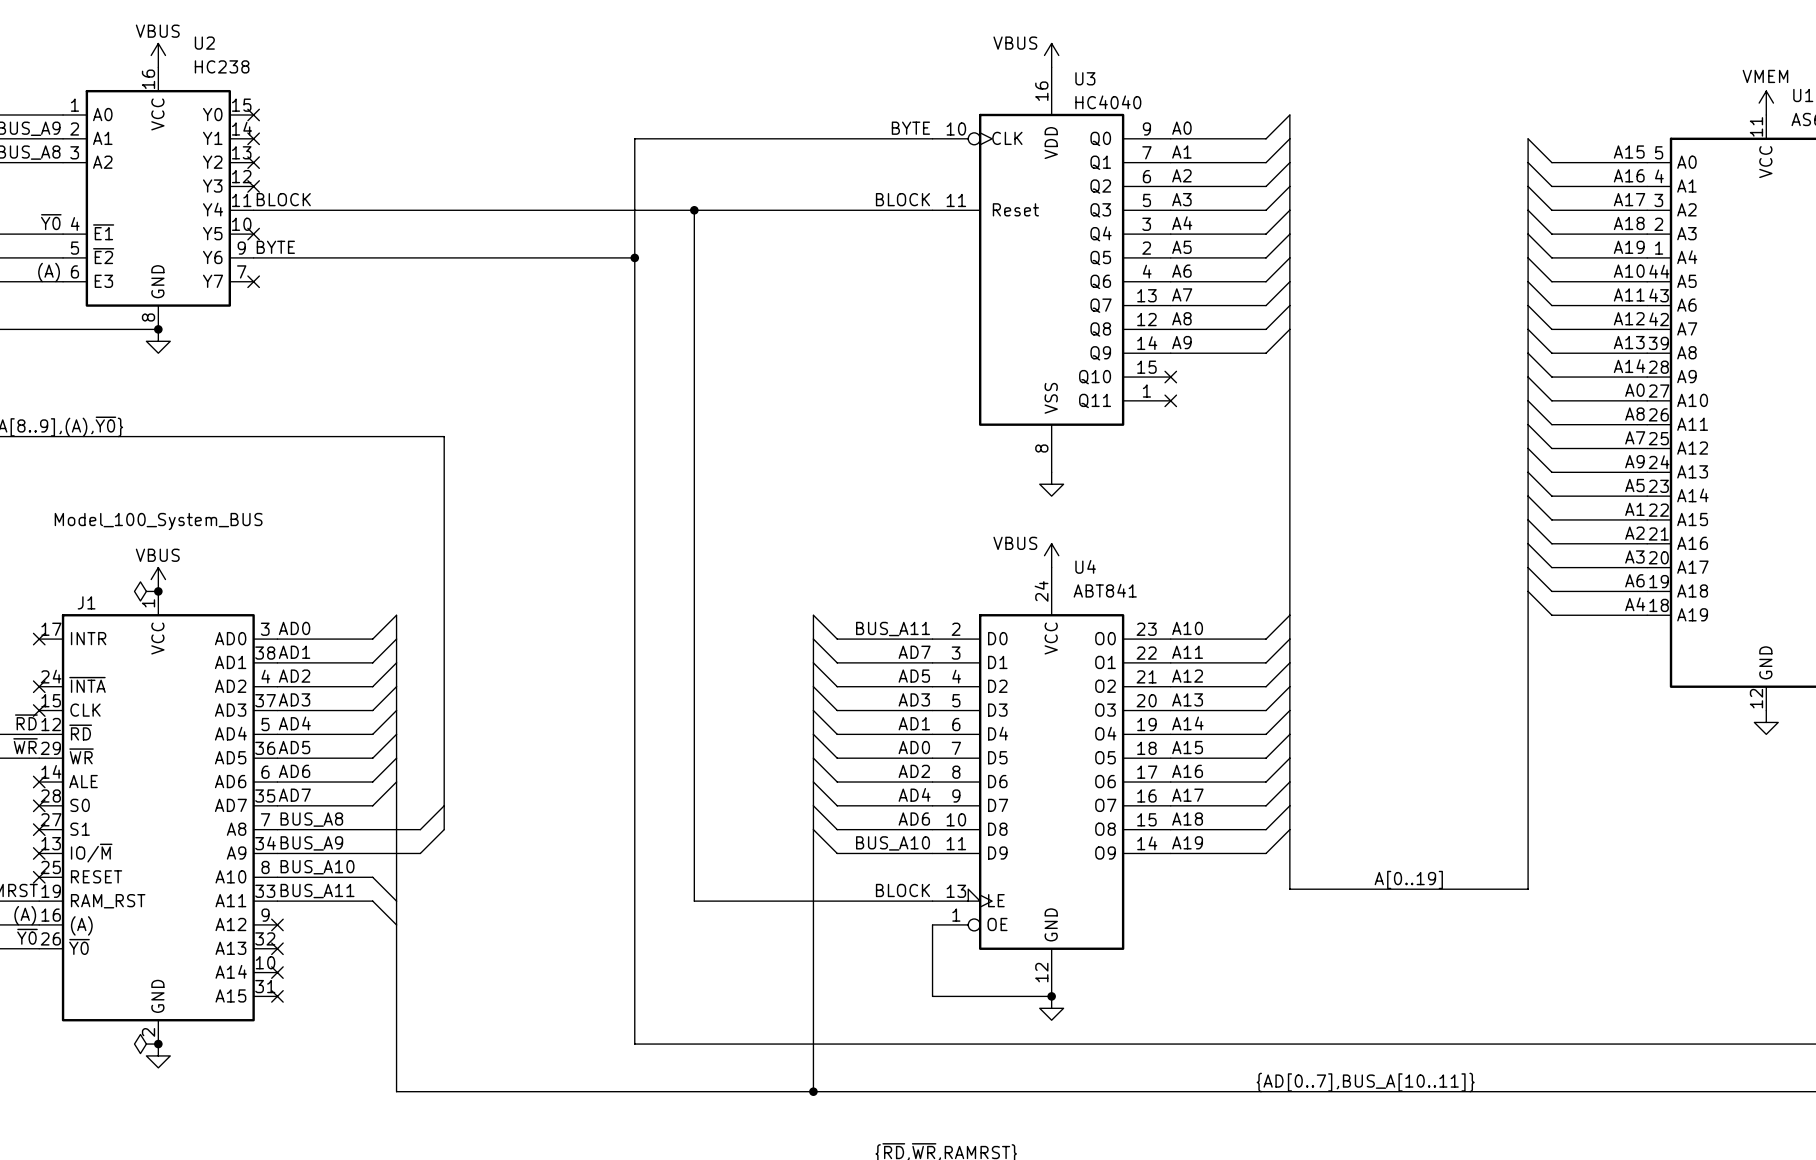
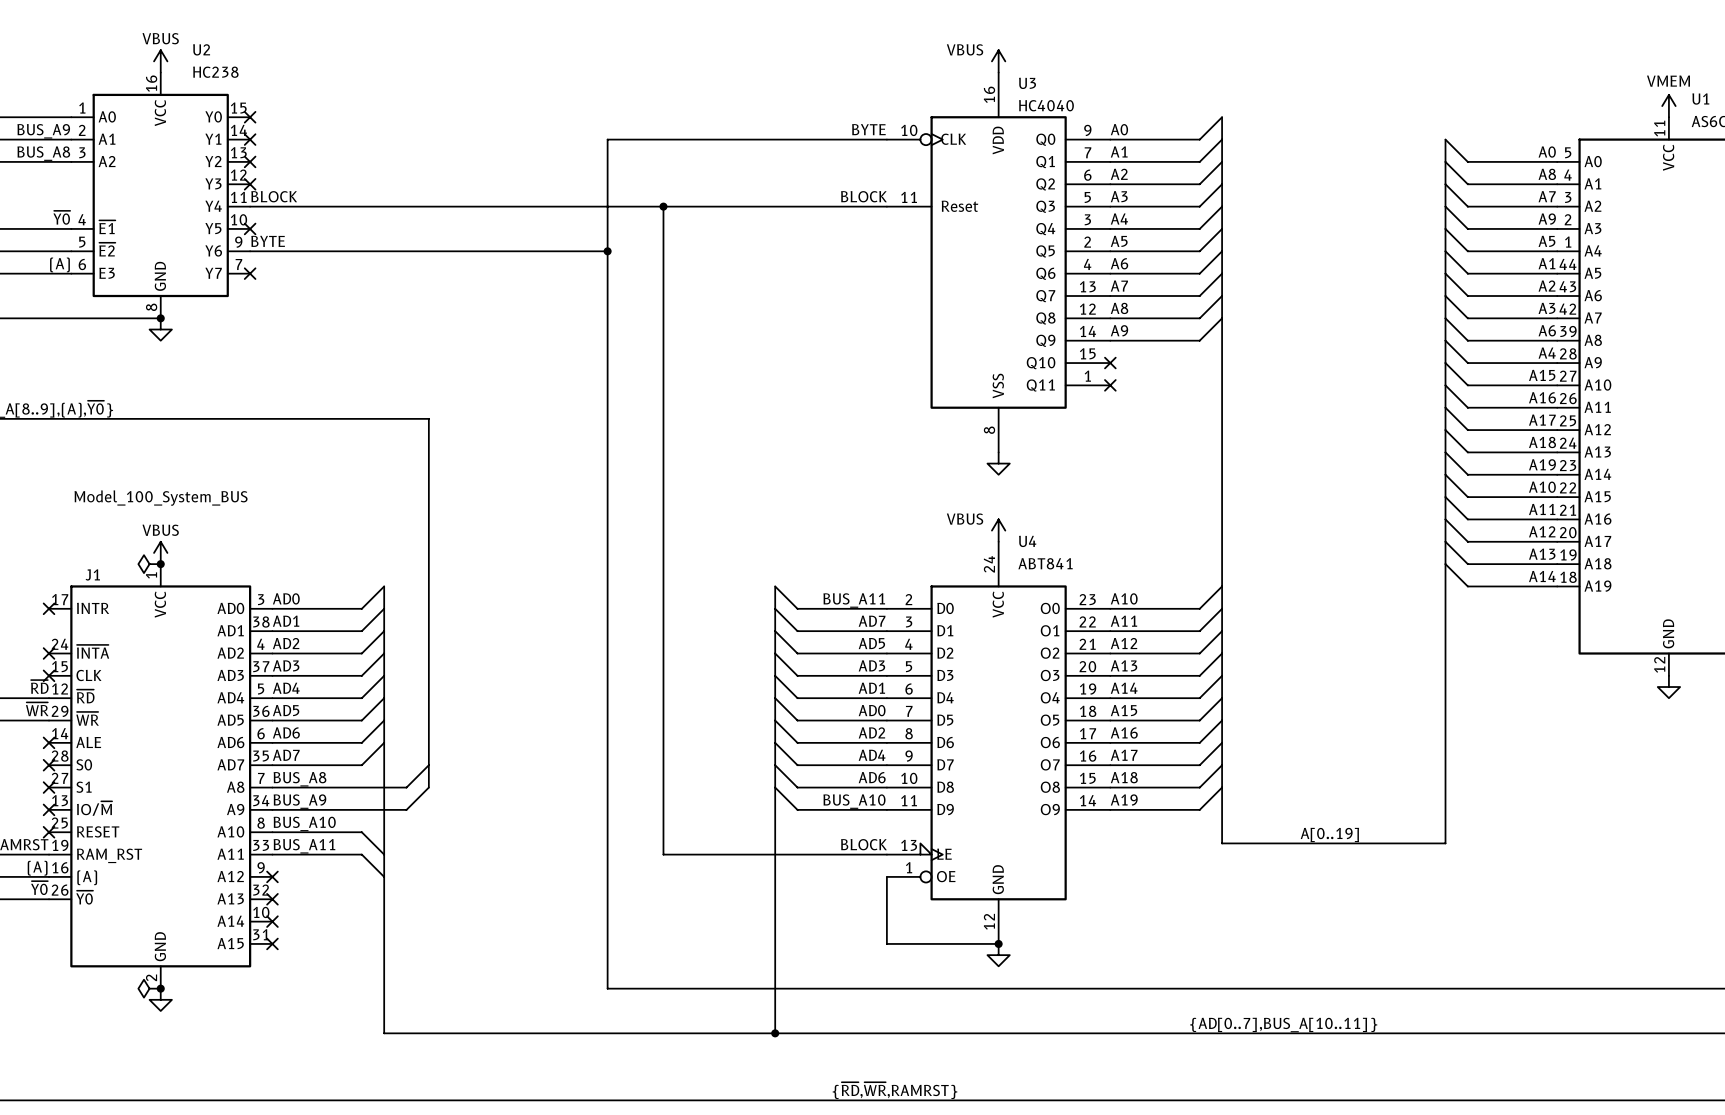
label: A15 (1629, 152) -> A0 (1547, 152)
label: A16 (1629, 175) -> A8 (1547, 174)
label: A17 (1629, 199) -> A7 (1547, 196)
label: A18 (1629, 223) -> A9 (1547, 219)
label: A19 (1629, 247) -> A5 (1546, 241)
label: A10 (1629, 271) -> A1 (1546, 263)
label: A11 (1629, 294) -> A2 (1547, 286)
label: A12 (1629, 318) -> A3 (1547, 308)
label: A13 (1629, 342) -> A6 (1547, 330)
label: A14 (1629, 366) -> A4 (1547, 353)
label: A0 (1634, 390) -> A15 (1542, 375)
label: A8 (1634, 414) -> A16 (1542, 397)
label: A7 (1635, 437) -> A17 (1542, 420)
label: A9 (1634, 461) -> A18 (1542, 442)
label: A5 (1634, 485) -> A19 (1542, 464)
label: A1 (1634, 509) -> A10 (1542, 487)
label: A2 (1634, 533) -> A11 (1542, 509)
label: A3 (1634, 556) -> A12 (1542, 531)
label: A6 (1634, 580) -> A13 (1542, 554)
label: A4 (1635, 604) -> A14 (1542, 576)

